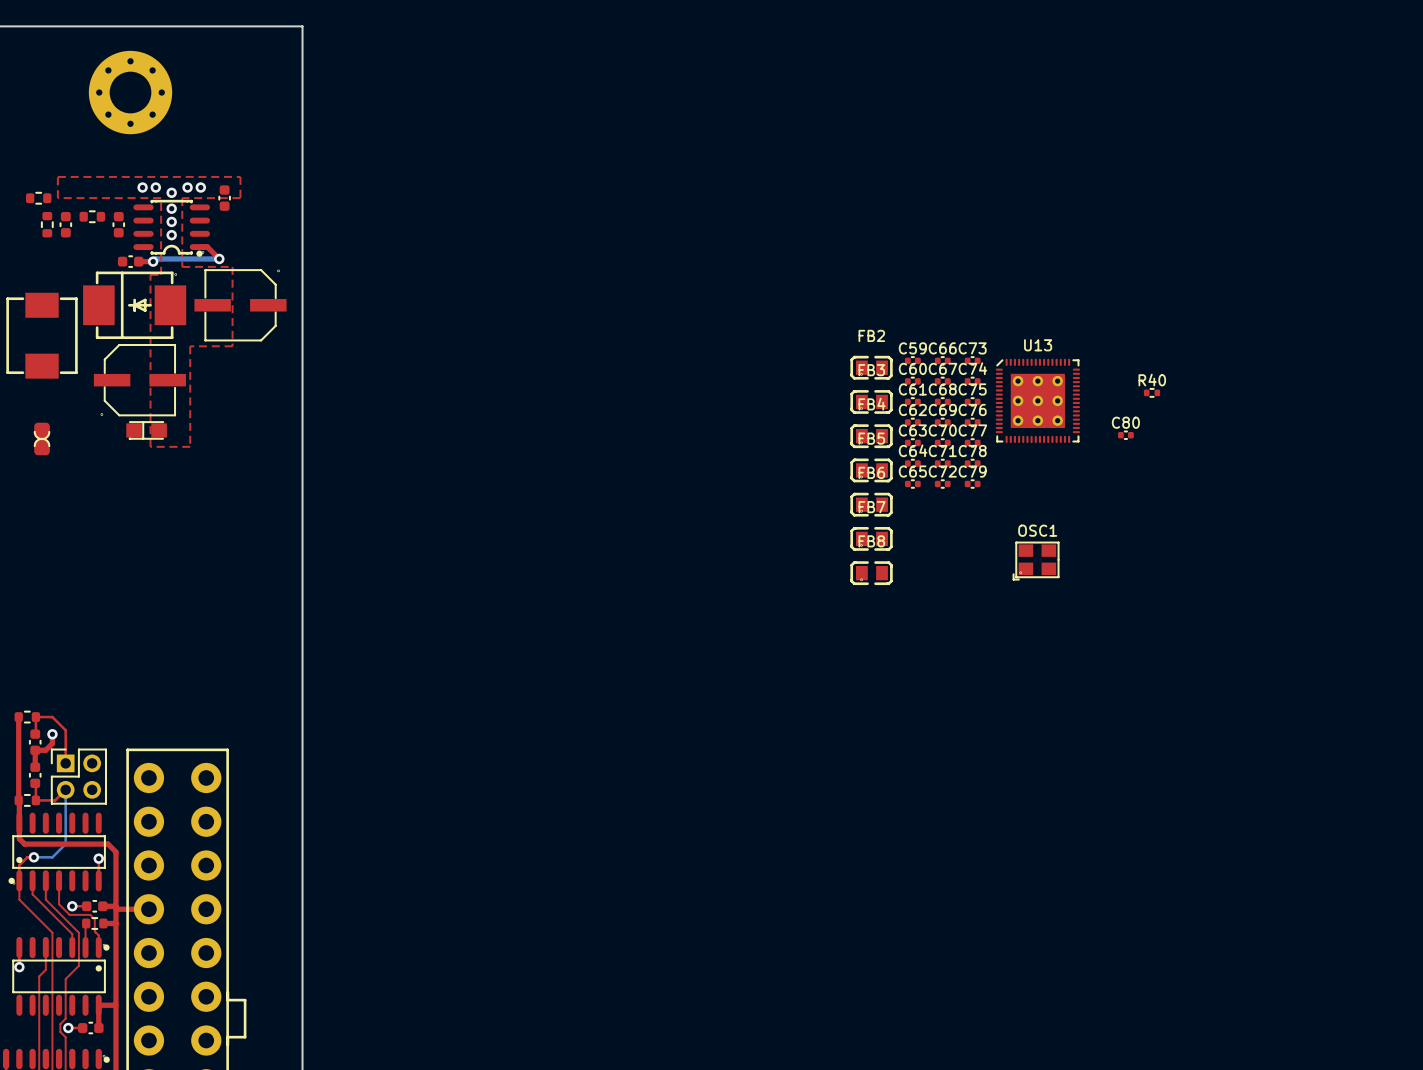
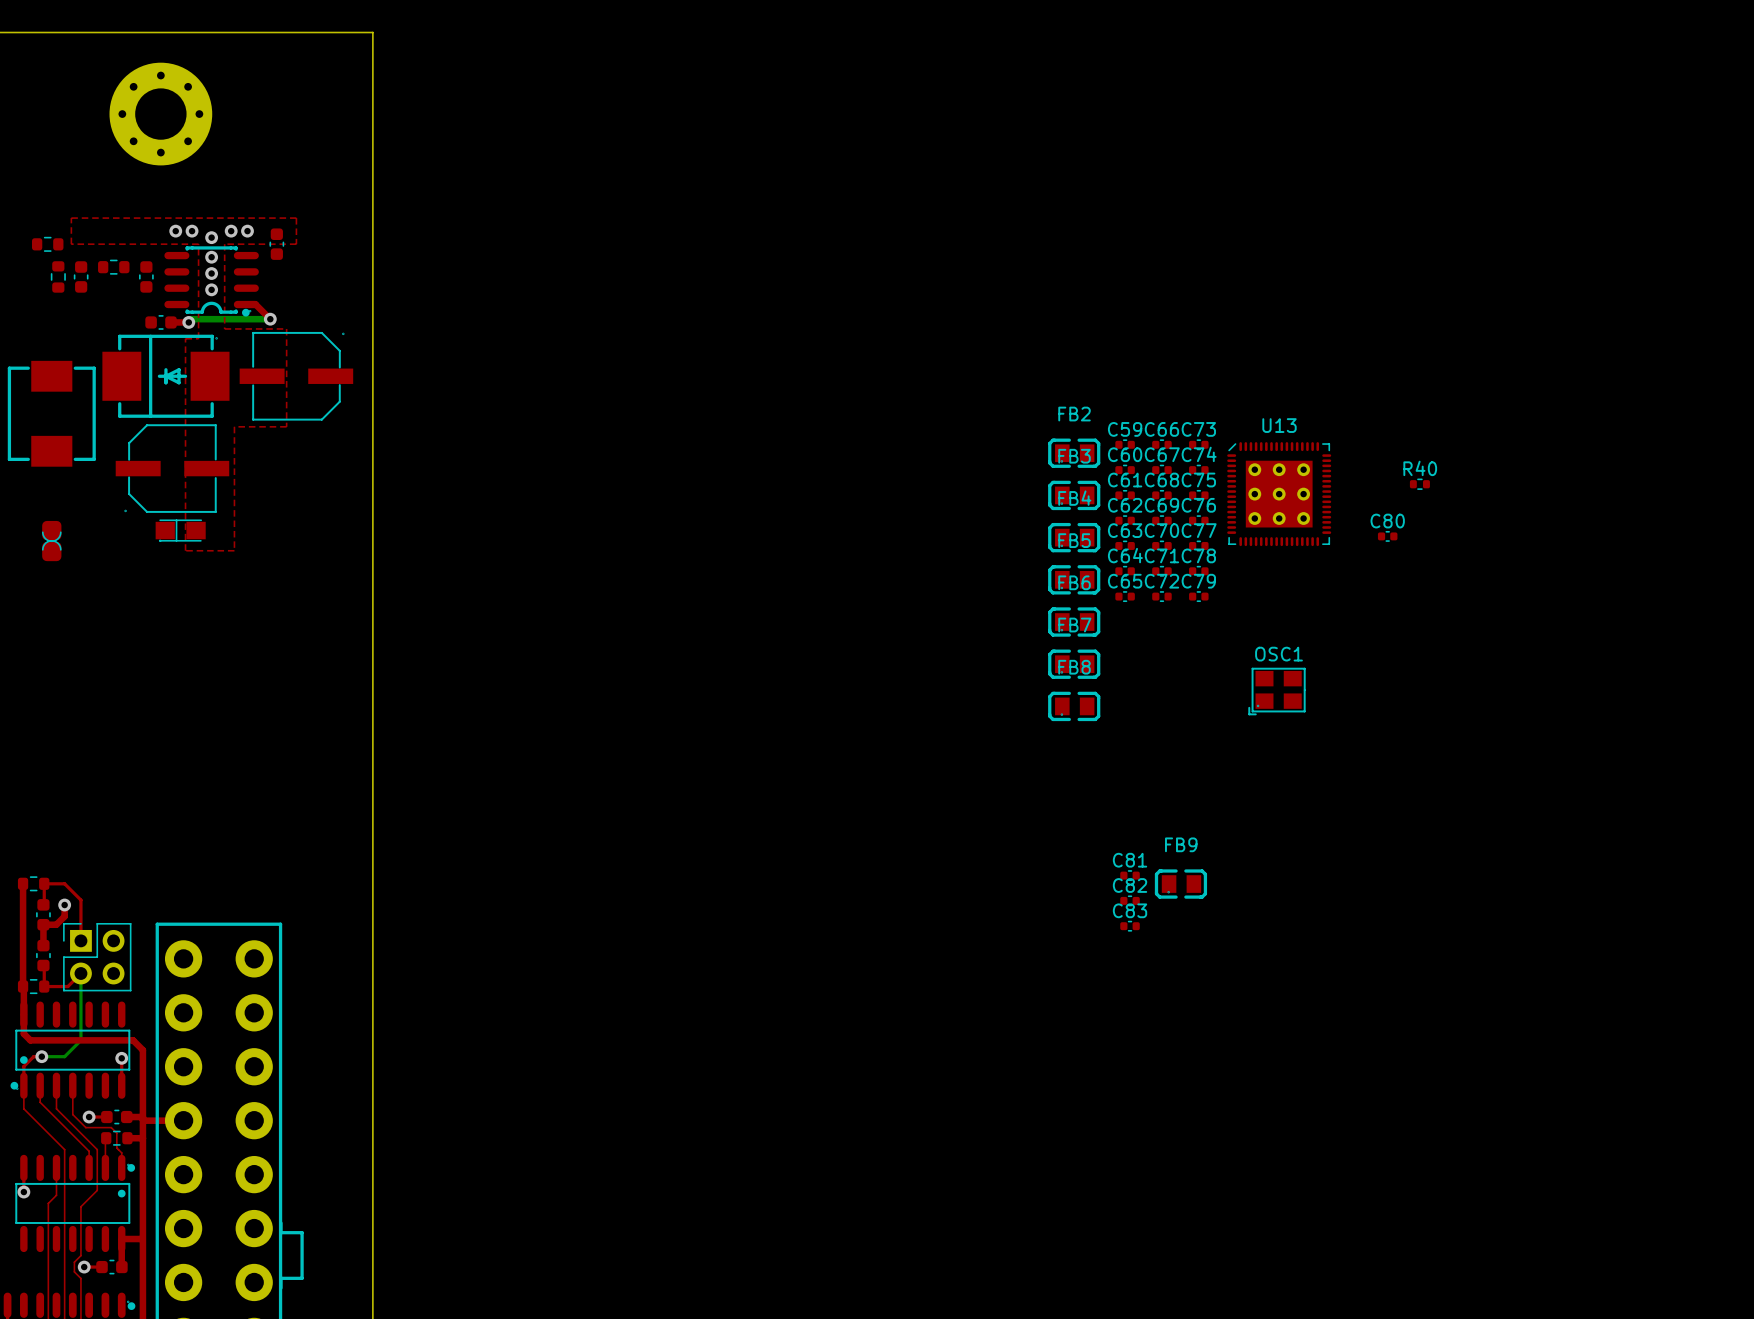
C81: none -> (1130, 875)
FB9: none -> (1180, 884)
C82: none -> (1130, 900)
C83: none -> (1130, 926)

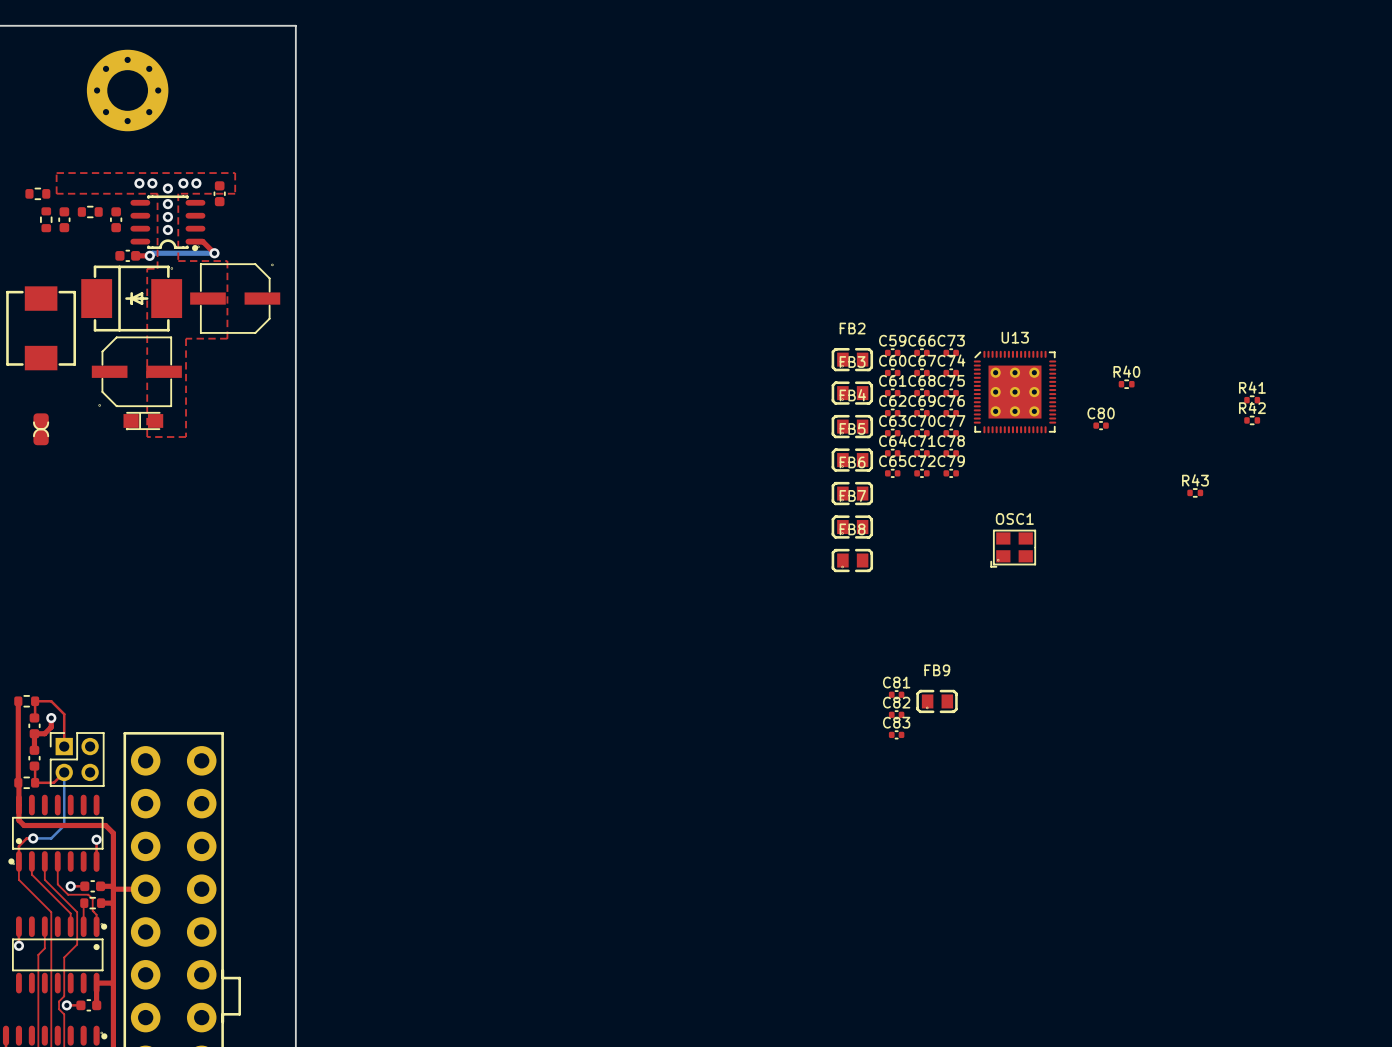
R41: none -> (1252, 400)
R42: none -> (1252, 420)
R43: none -> (1195, 492)

